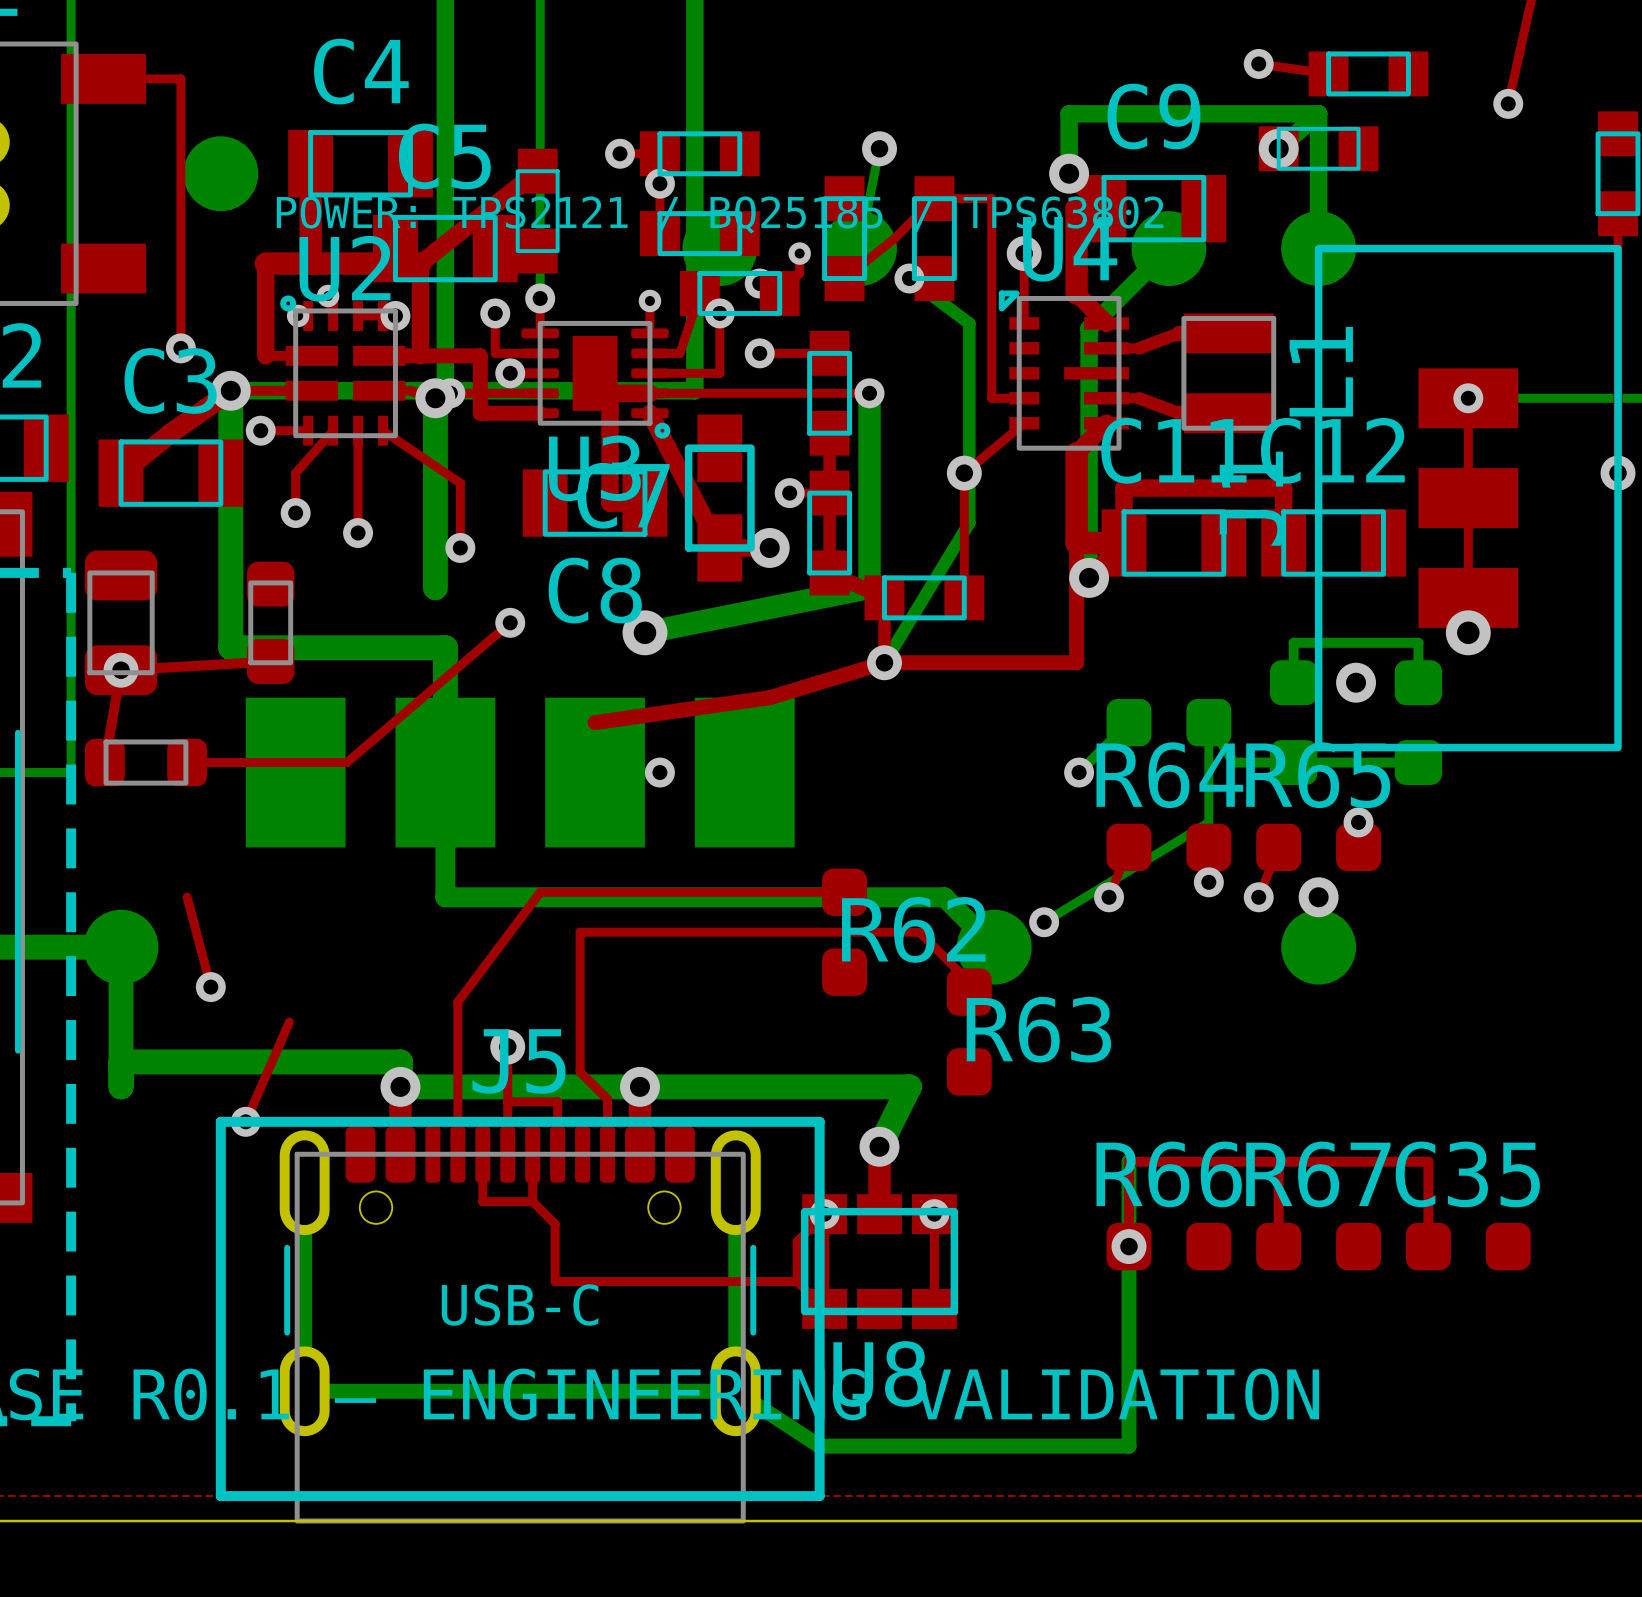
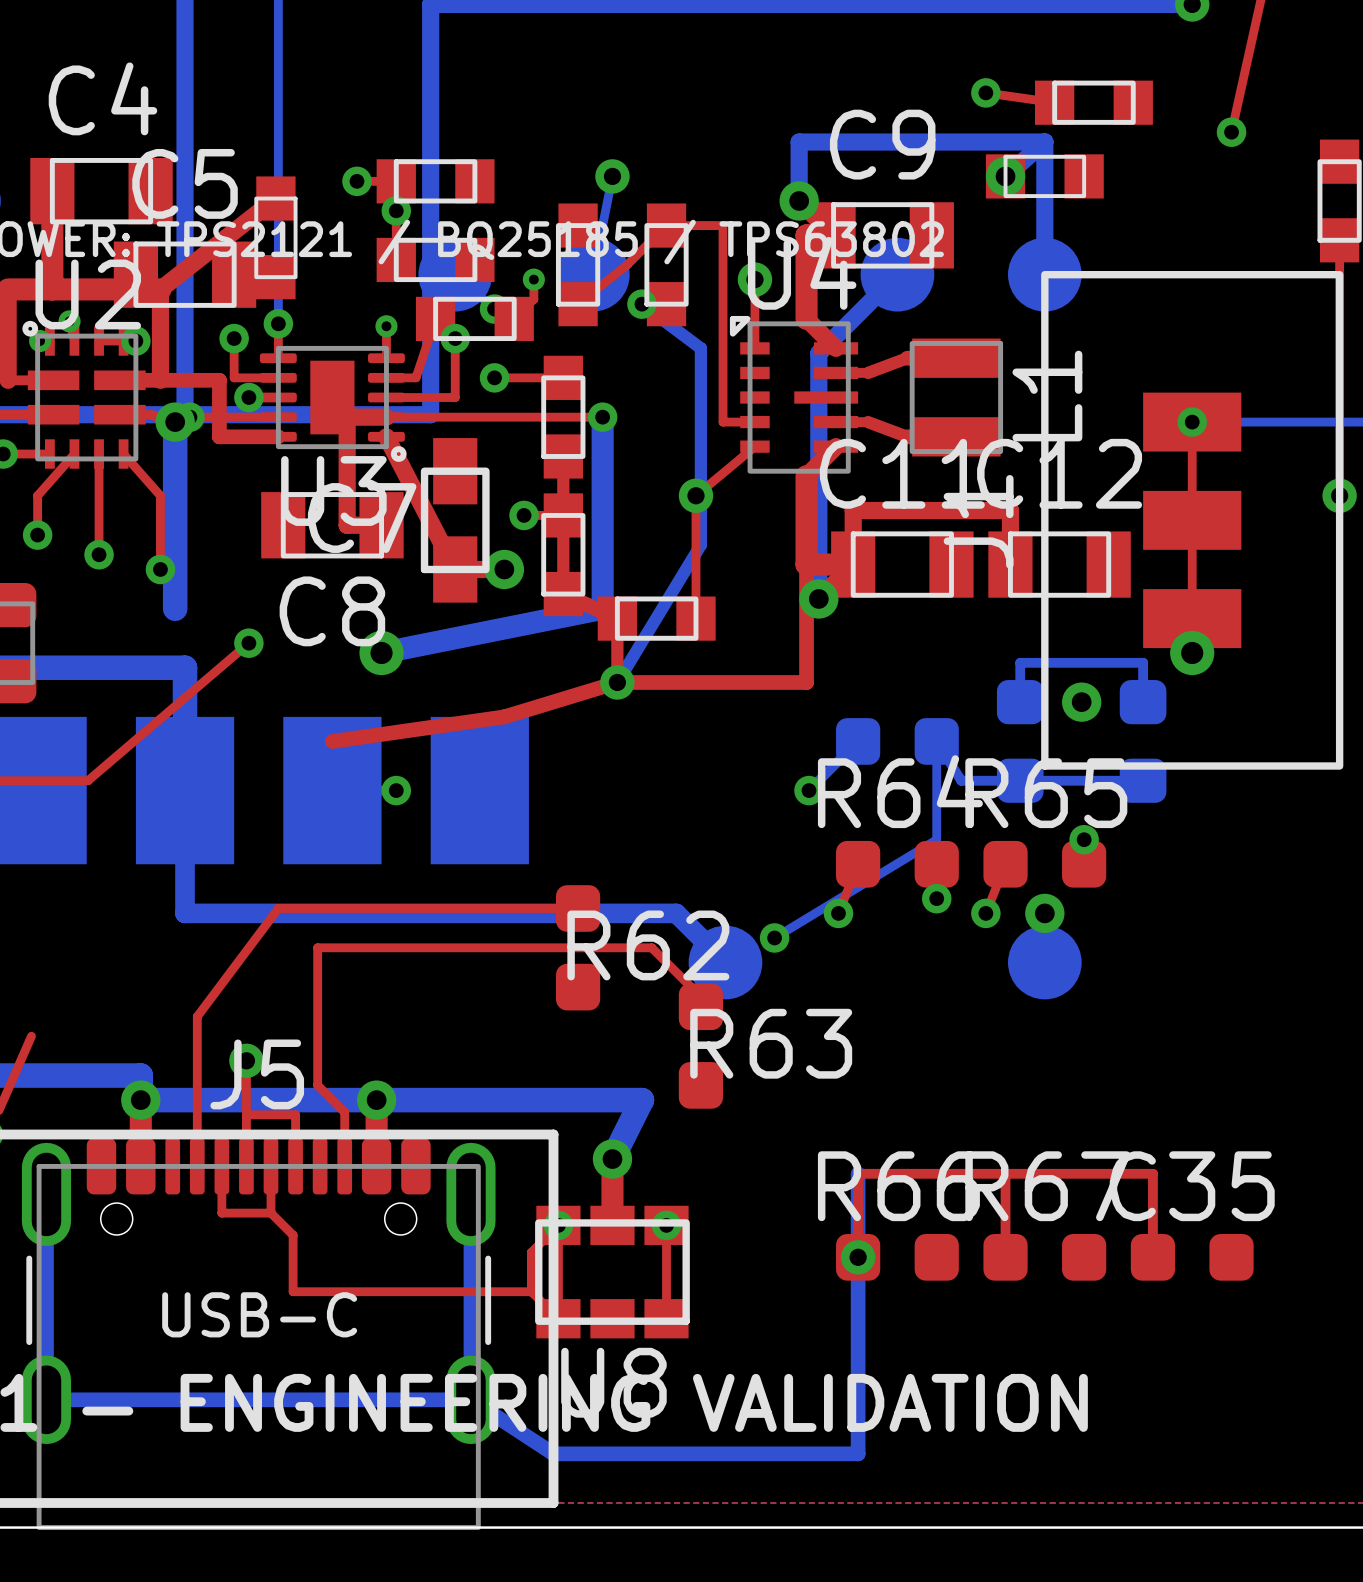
top track: (383, 430) (460, 483) (460, 547) -> (123, 454) (160, 495) (160, 569)
via position: (460, 547) -> (160, 569)

